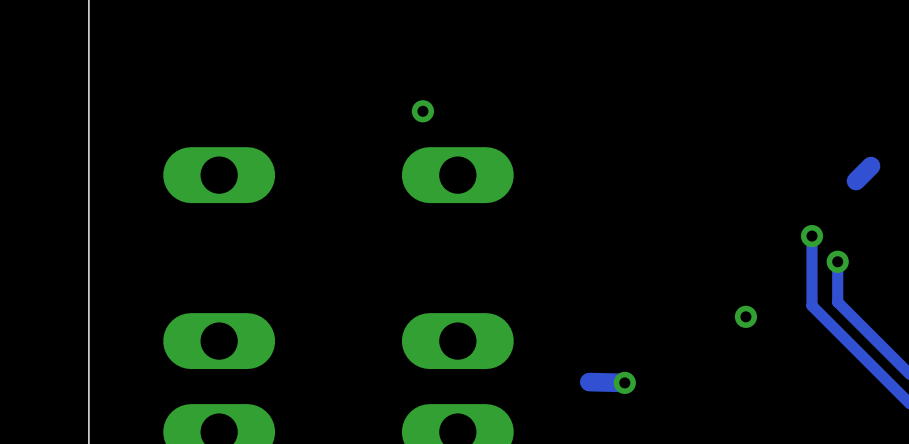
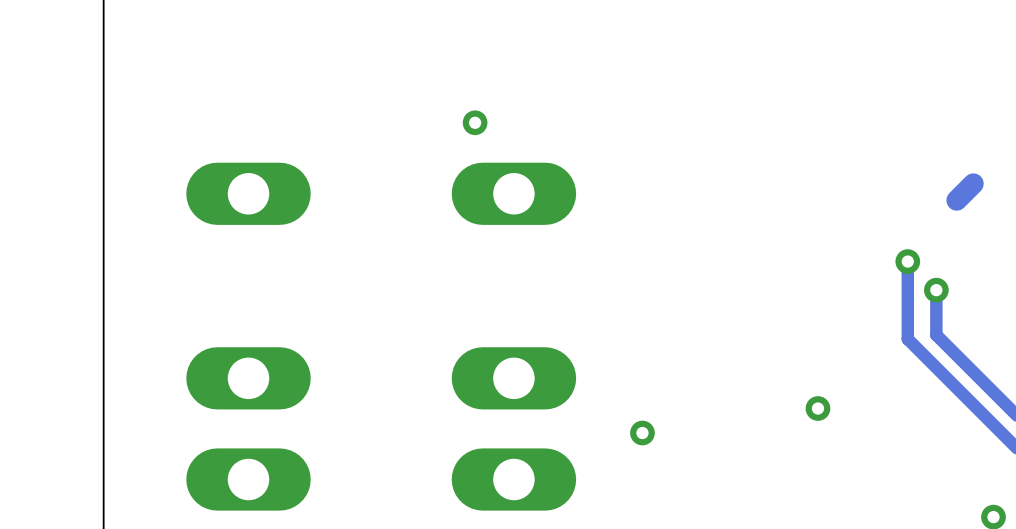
via: (745, 316) -> none
via: none -> (817, 408)
track: (589, 382) (624, 382) -> none
via position: (624, 382) -> (642, 433)

